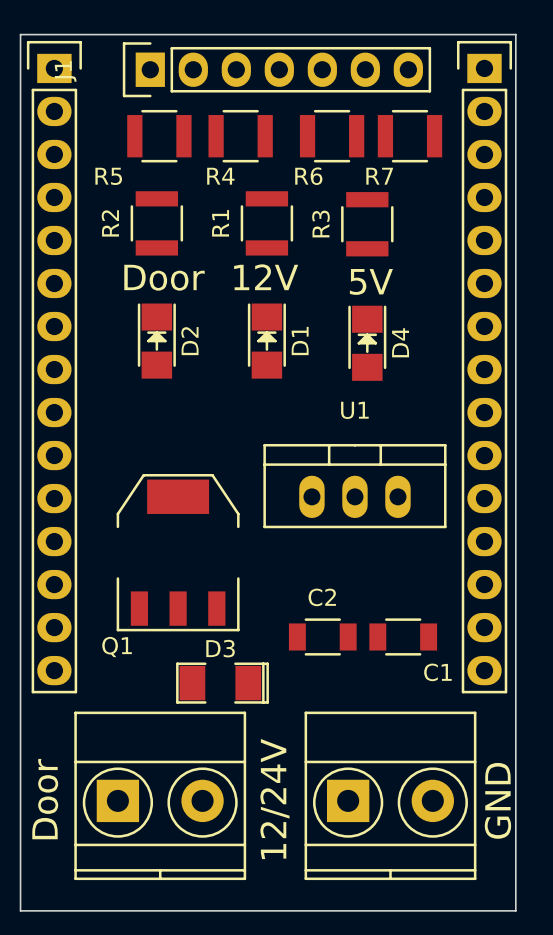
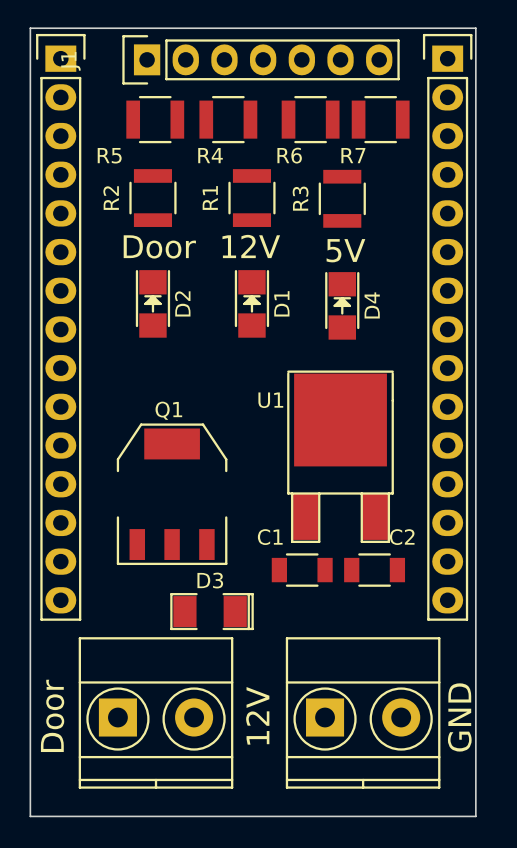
U1 name position: U1 (354, 410) -> U1 (270, 400)
U1 footprint: [263, 443, 447, 529] -> [287, 370, 394, 543]
C2 name: C2 (322, 597) -> C1 (270, 537)
Q1 name position: Q1 (117, 647) -> Q1 (168, 410)
C1 name: C1 (437, 672) -> C2 (402, 537)
text: 12/24V (274, 799) -> 12V (257, 715)

